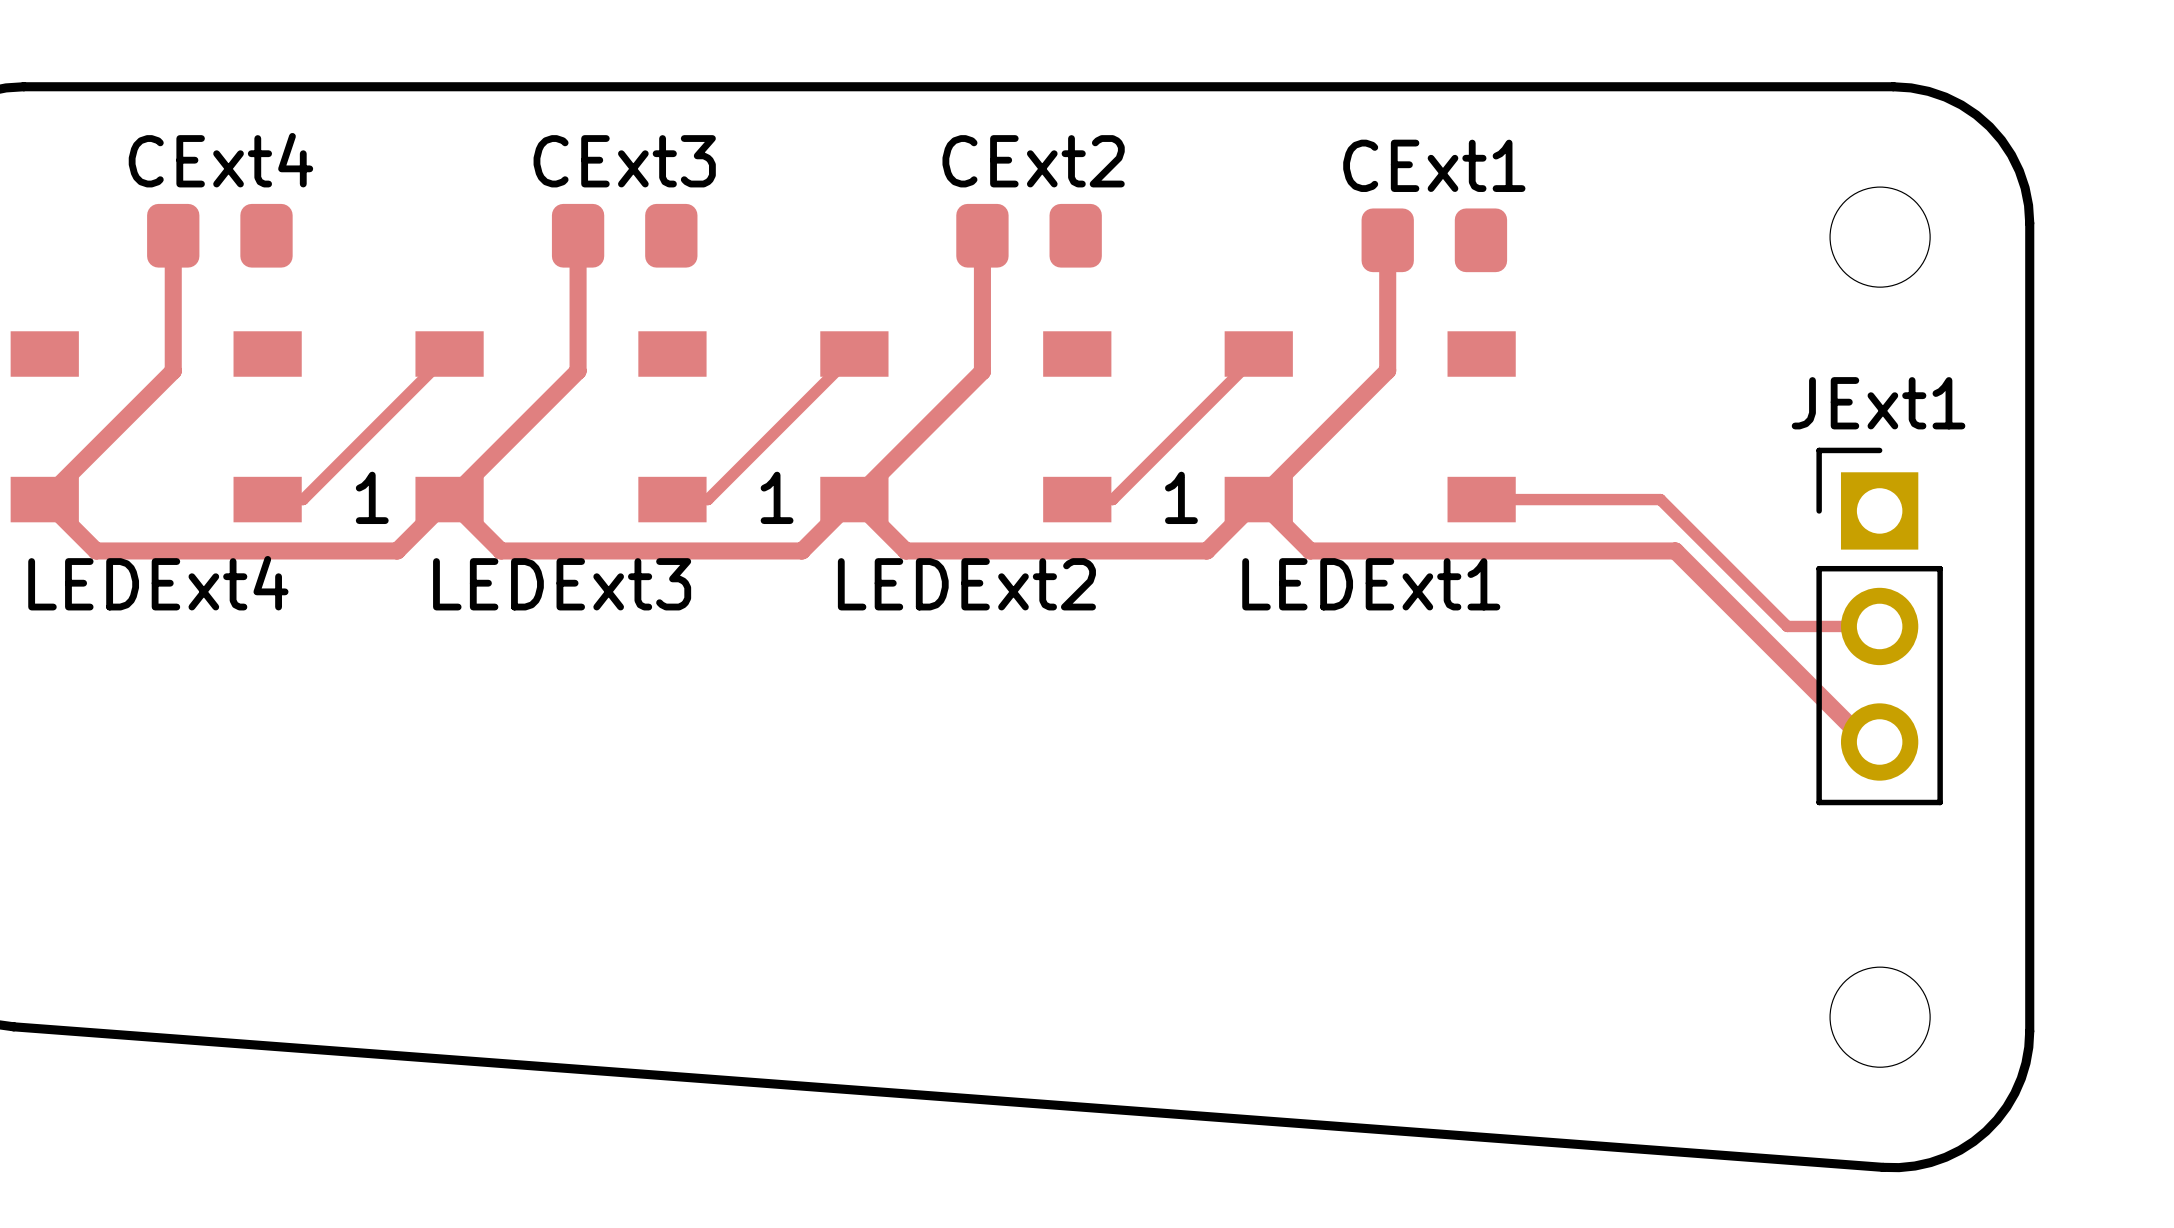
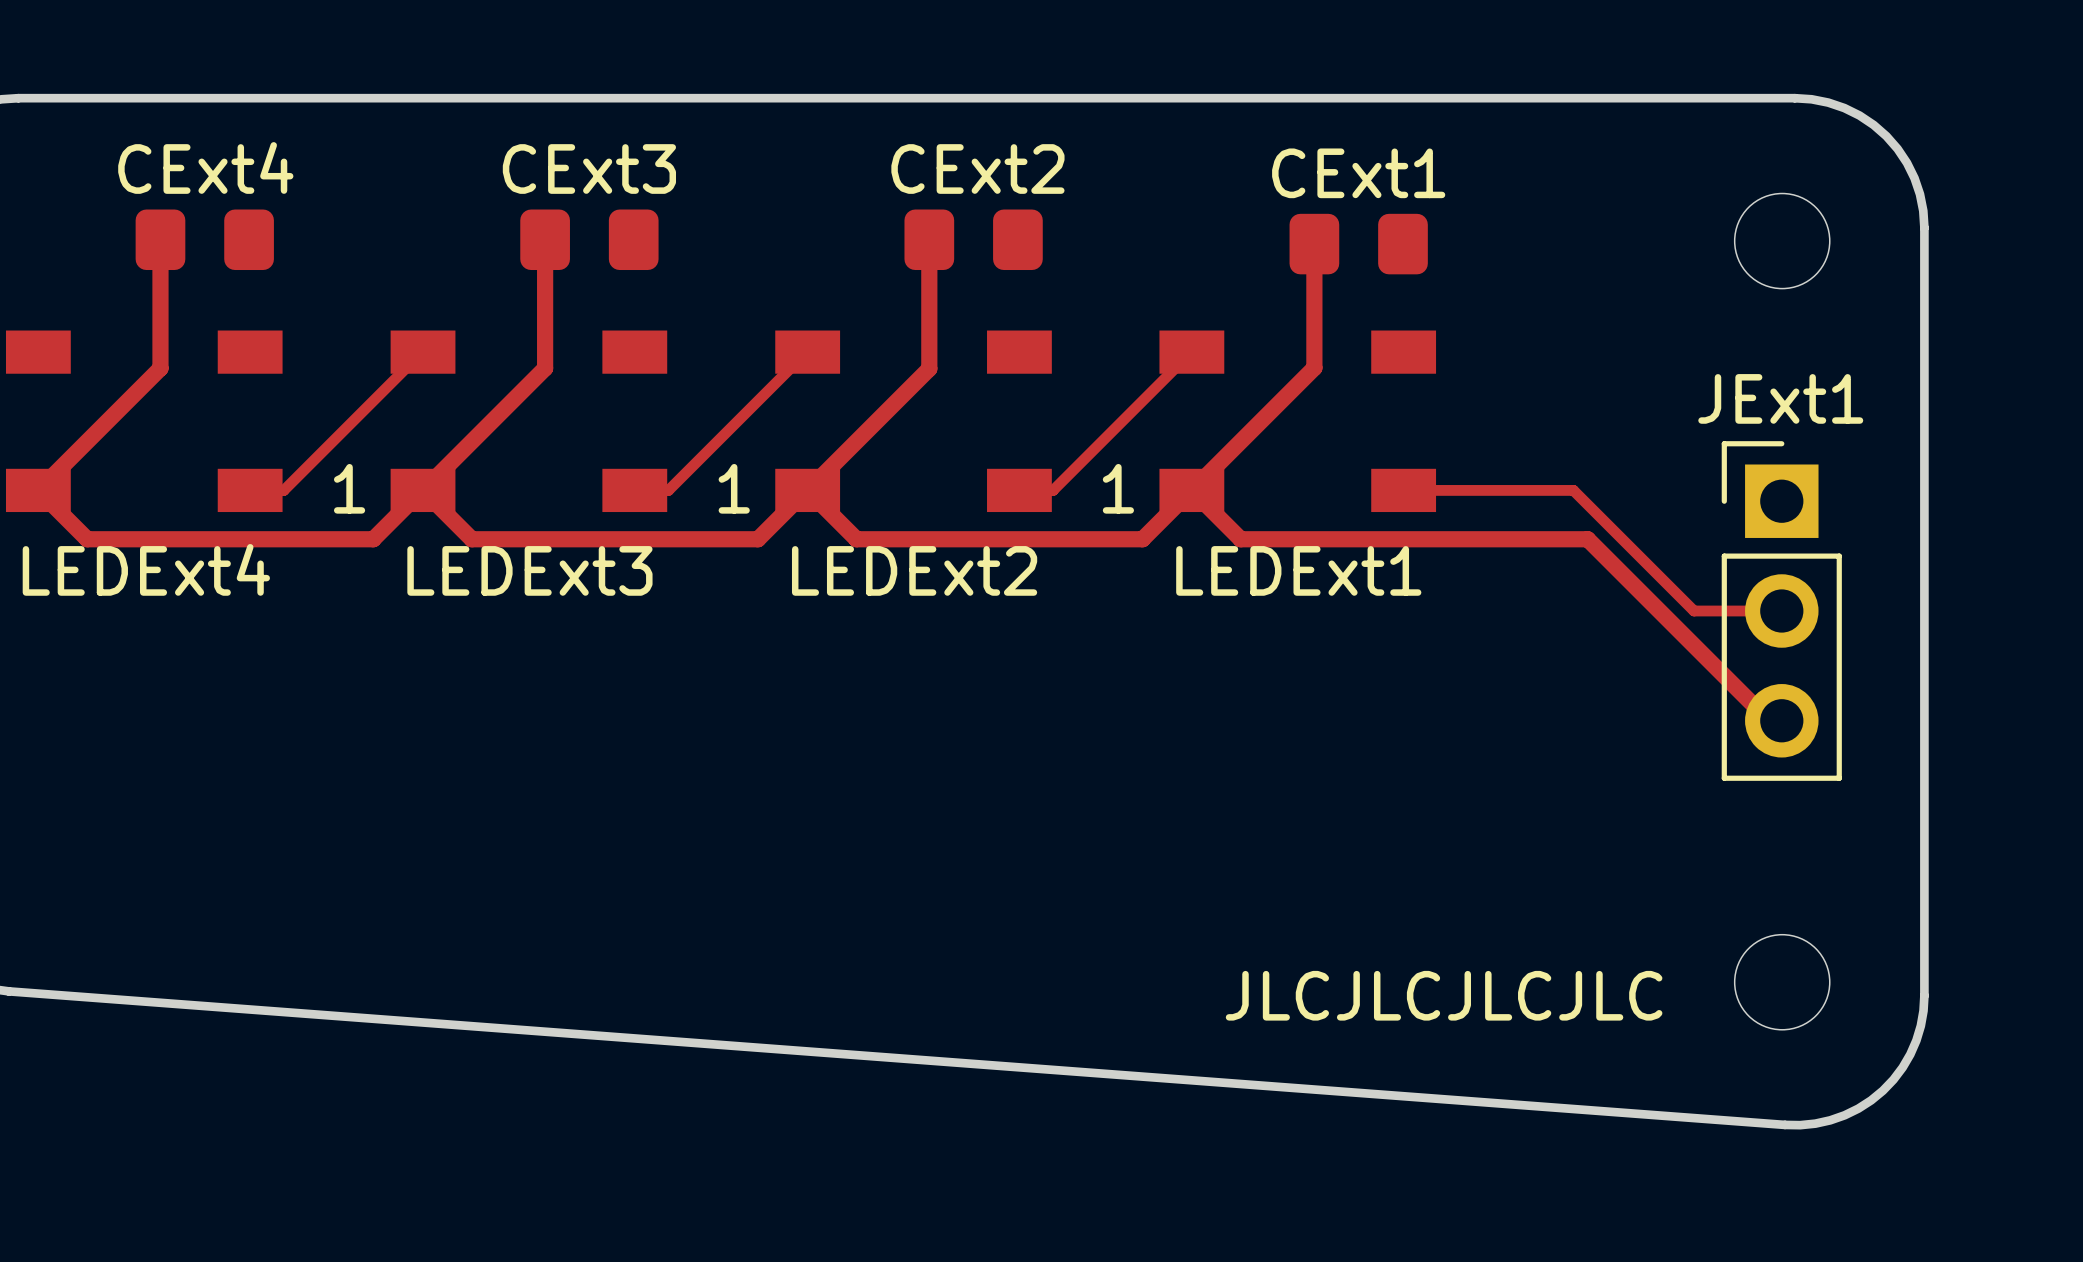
text: none -> JLCJLCJLCJLC (1444, 995)

